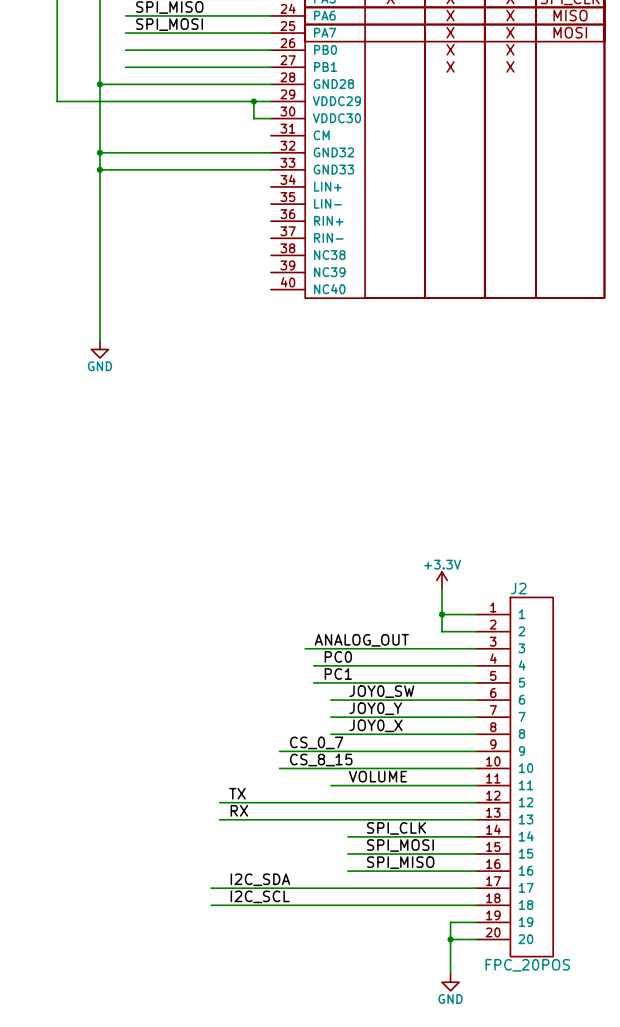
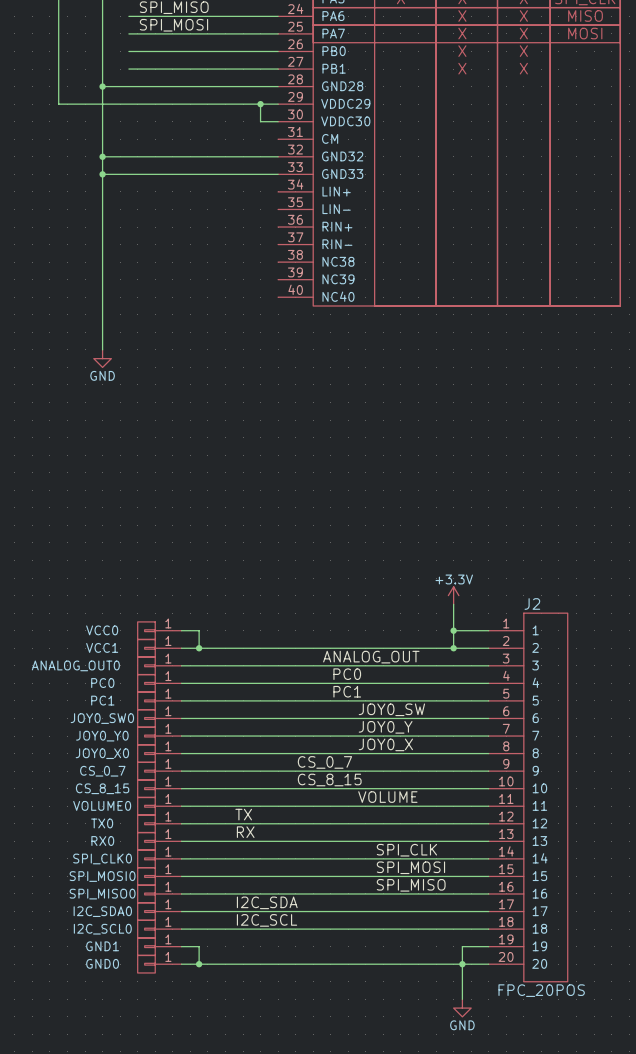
VCC0: none -> (159, 630)
wire: none -> (181, 630) (199, 630) (199, 648)
VCC1: none -> (159, 648)
wire: none -> (181, 648) (453, 648)
junction: none -> (199, 648)
junction: none -> (453, 648)
ANALOG_OUT0: none -> (159, 665)
wire: none -> (181, 665) (313, 665)
PC0: none -> (159, 683)
wire: none -> (181, 683) (321, 683)
PC1: none -> (159, 700)
wire: none -> (181, 700) (321, 700)
JOY0_SW0: none -> (159, 718)
wire: none -> (181, 718) (339, 718)
JOY0_Y0: none -> (159, 736)
wire: none -> (181, 736) (339, 736)
JOY0_X0: none -> (159, 753)
wire: none -> (181, 753) (339, 753)
CS_0_7: none -> (159, 771)
wire: none -> (181, 771) (286, 771)
CS_8_15: none -> (159, 788)
wire: none -> (181, 788) (286, 788)
VOLUME0: none -> (159, 806)
wire: none -> (181, 806) (339, 806)
TX0: none -> (159, 823)
wire: none -> (181, 823) (225, 823)
RX0: none -> (159, 841)
wire: none -> (181, 841) (225, 841)
SPI_CLK0: none -> (159, 858)
wire: none -> (181, 858) (357, 858)
SPI_MOSI0: none -> (159, 876)
wire: none -> (181, 876) (357, 876)
SPI_MISO0: none -> (159, 893)
wire: none -> (181, 893) (357, 893)
I2C_SDA0: none -> (159, 911)
wire: none -> (181, 911) (216, 911)
I2C_SCL0: none -> (159, 929)
wire: none -> (181, 929) (216, 929)
GND1: none -> (159, 946)
wire: none -> (181, 946) (199, 946) (199, 964)
GND0: none -> (159, 964)
wire: none -> (181, 964) (462, 964)
junction: none -> (199, 964)

